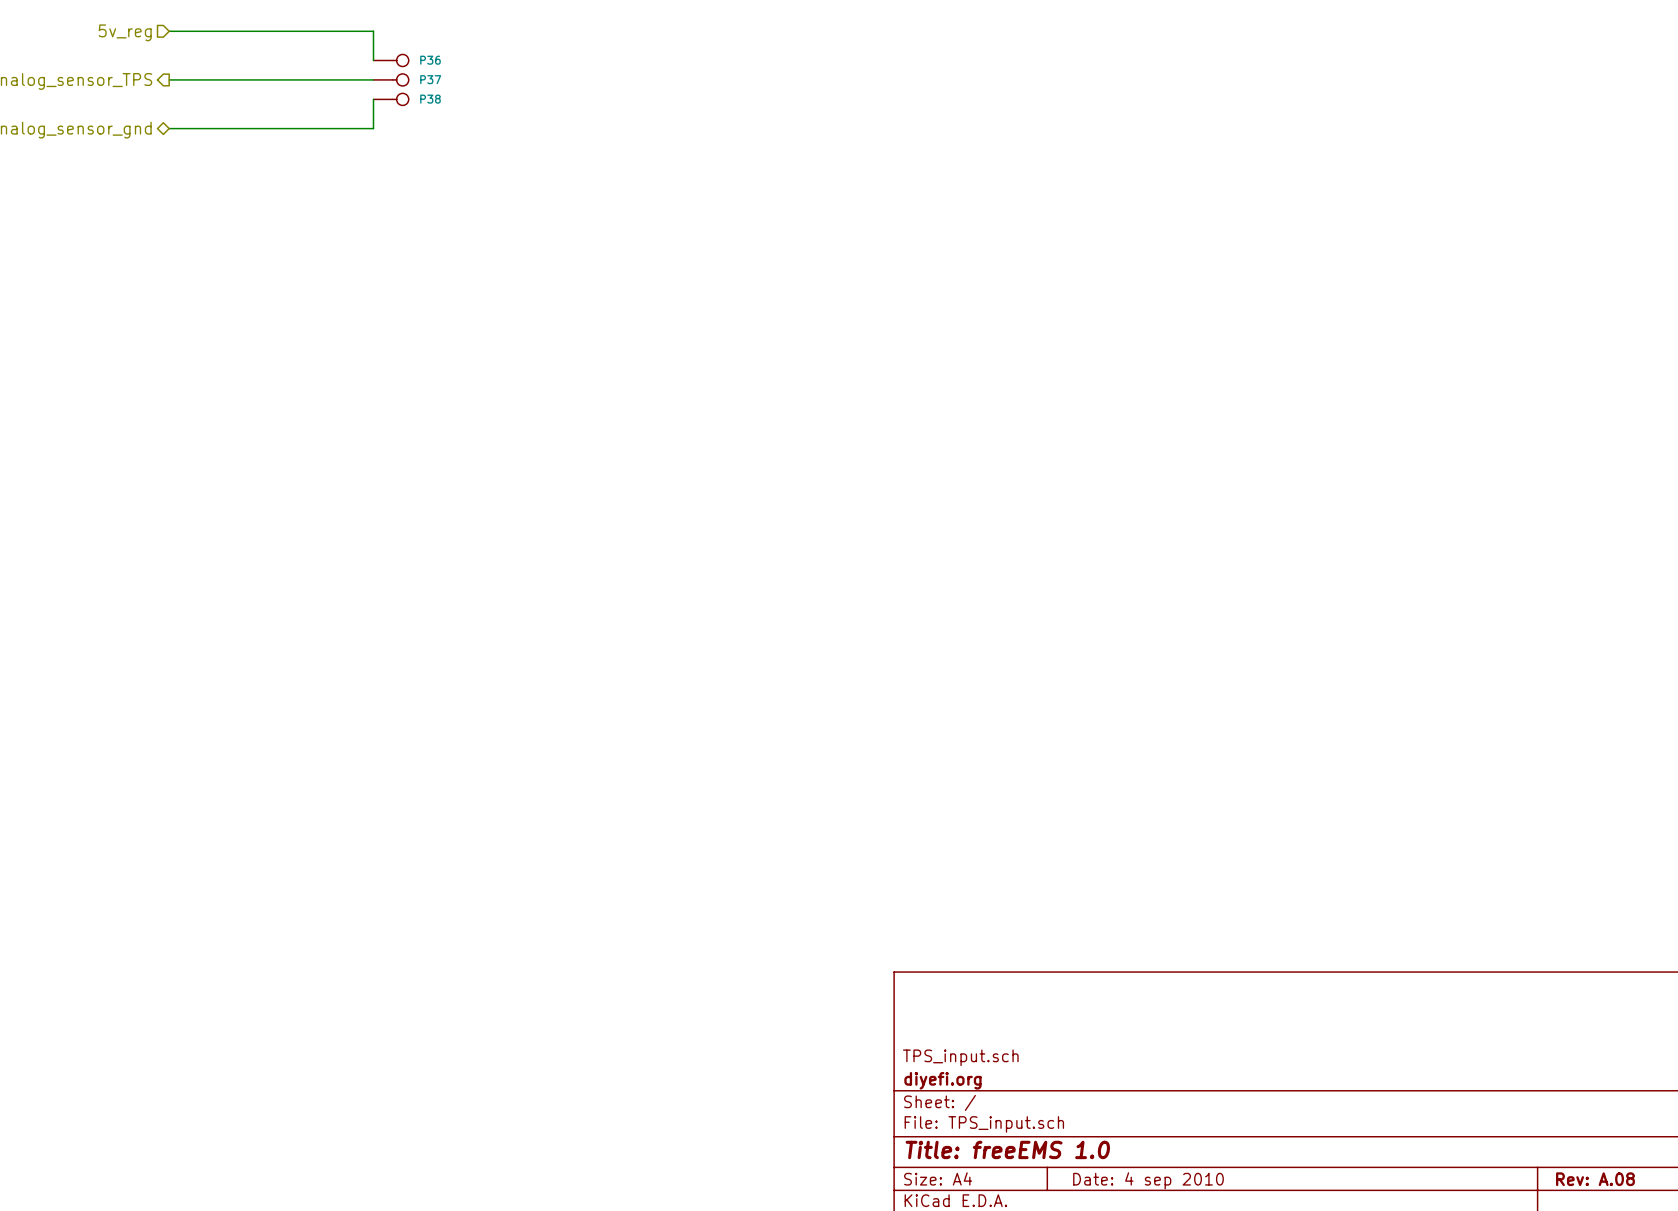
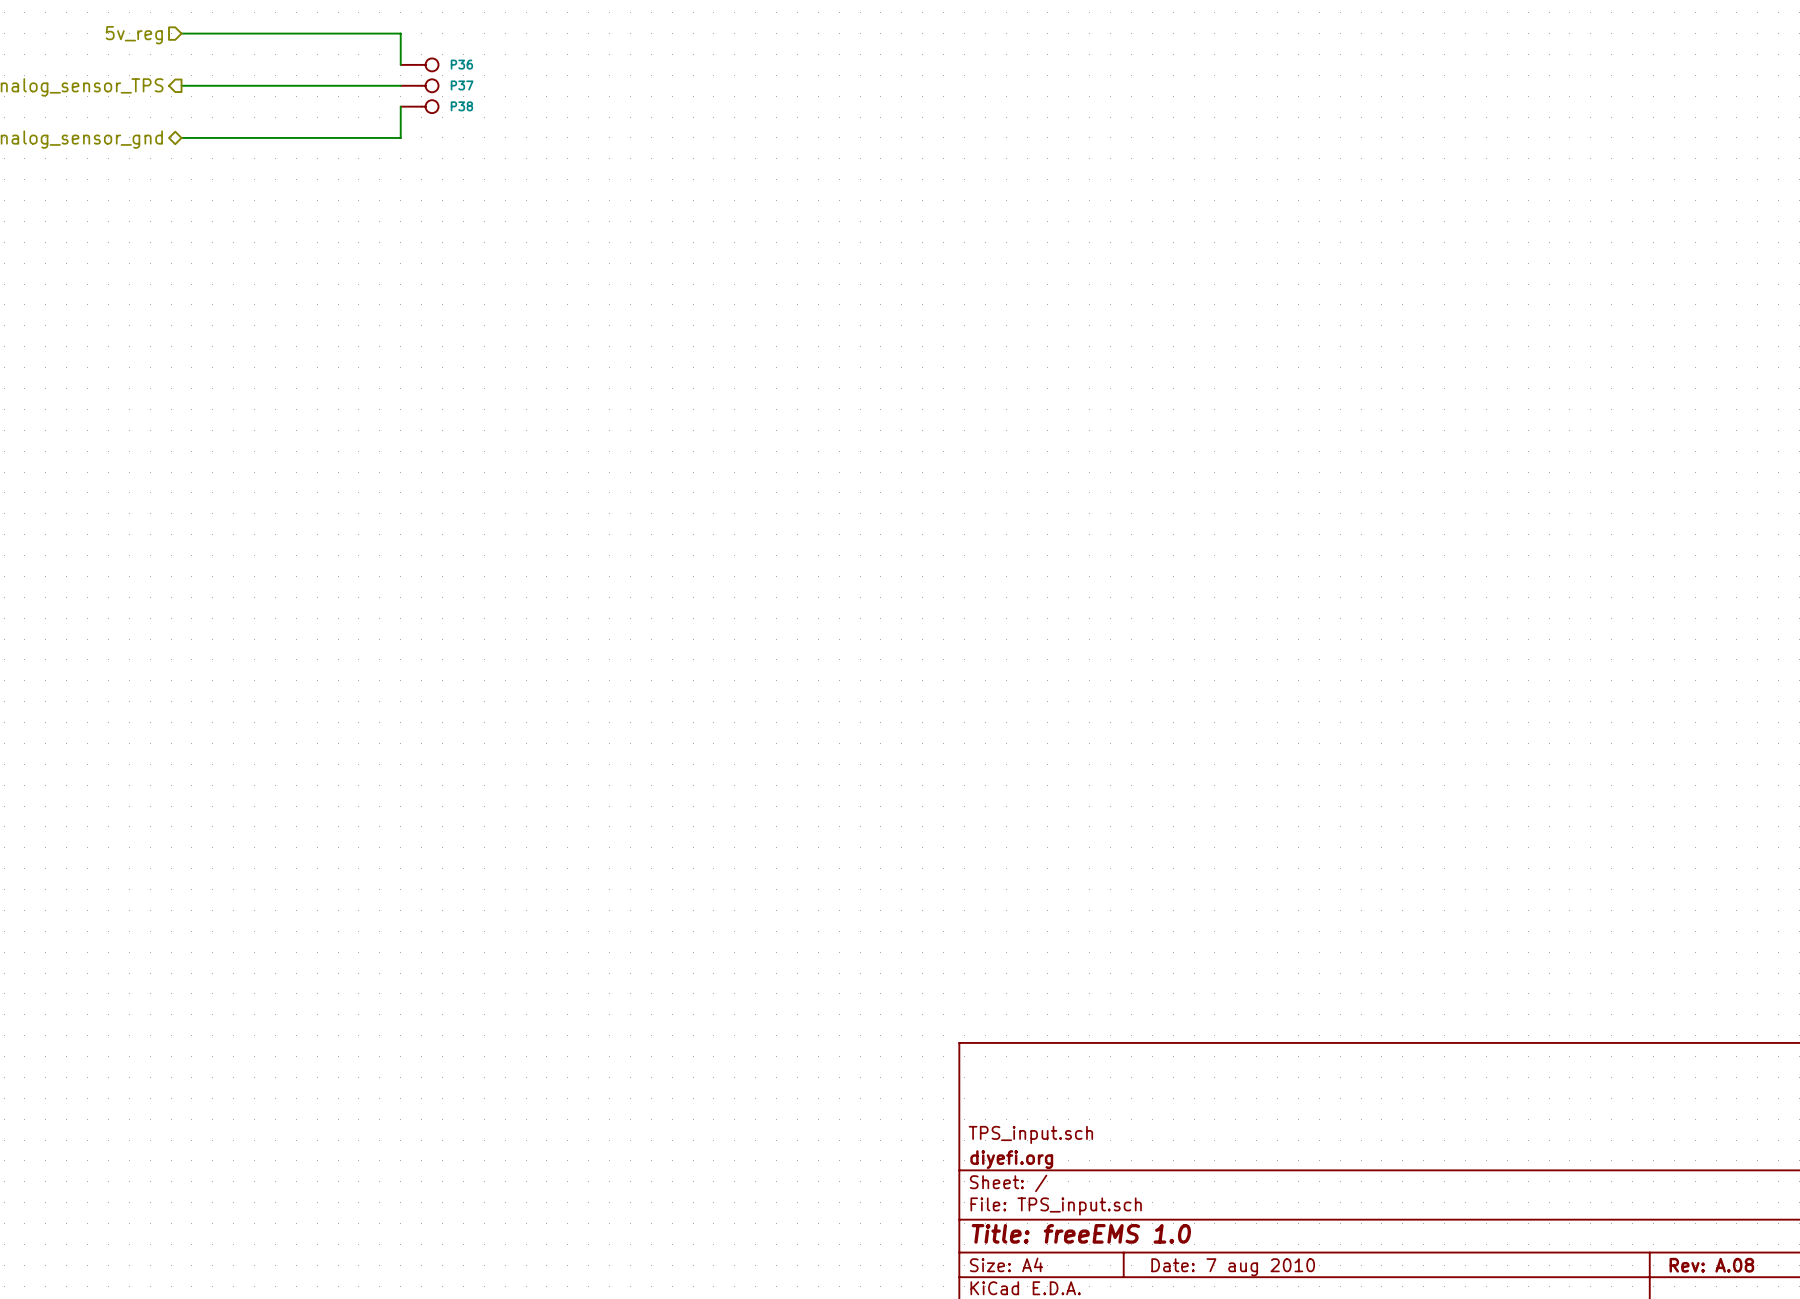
title block: Date: 4 sep 2010 (1148, 1180) -> Date: 7 aug 2010 (1233, 1267)

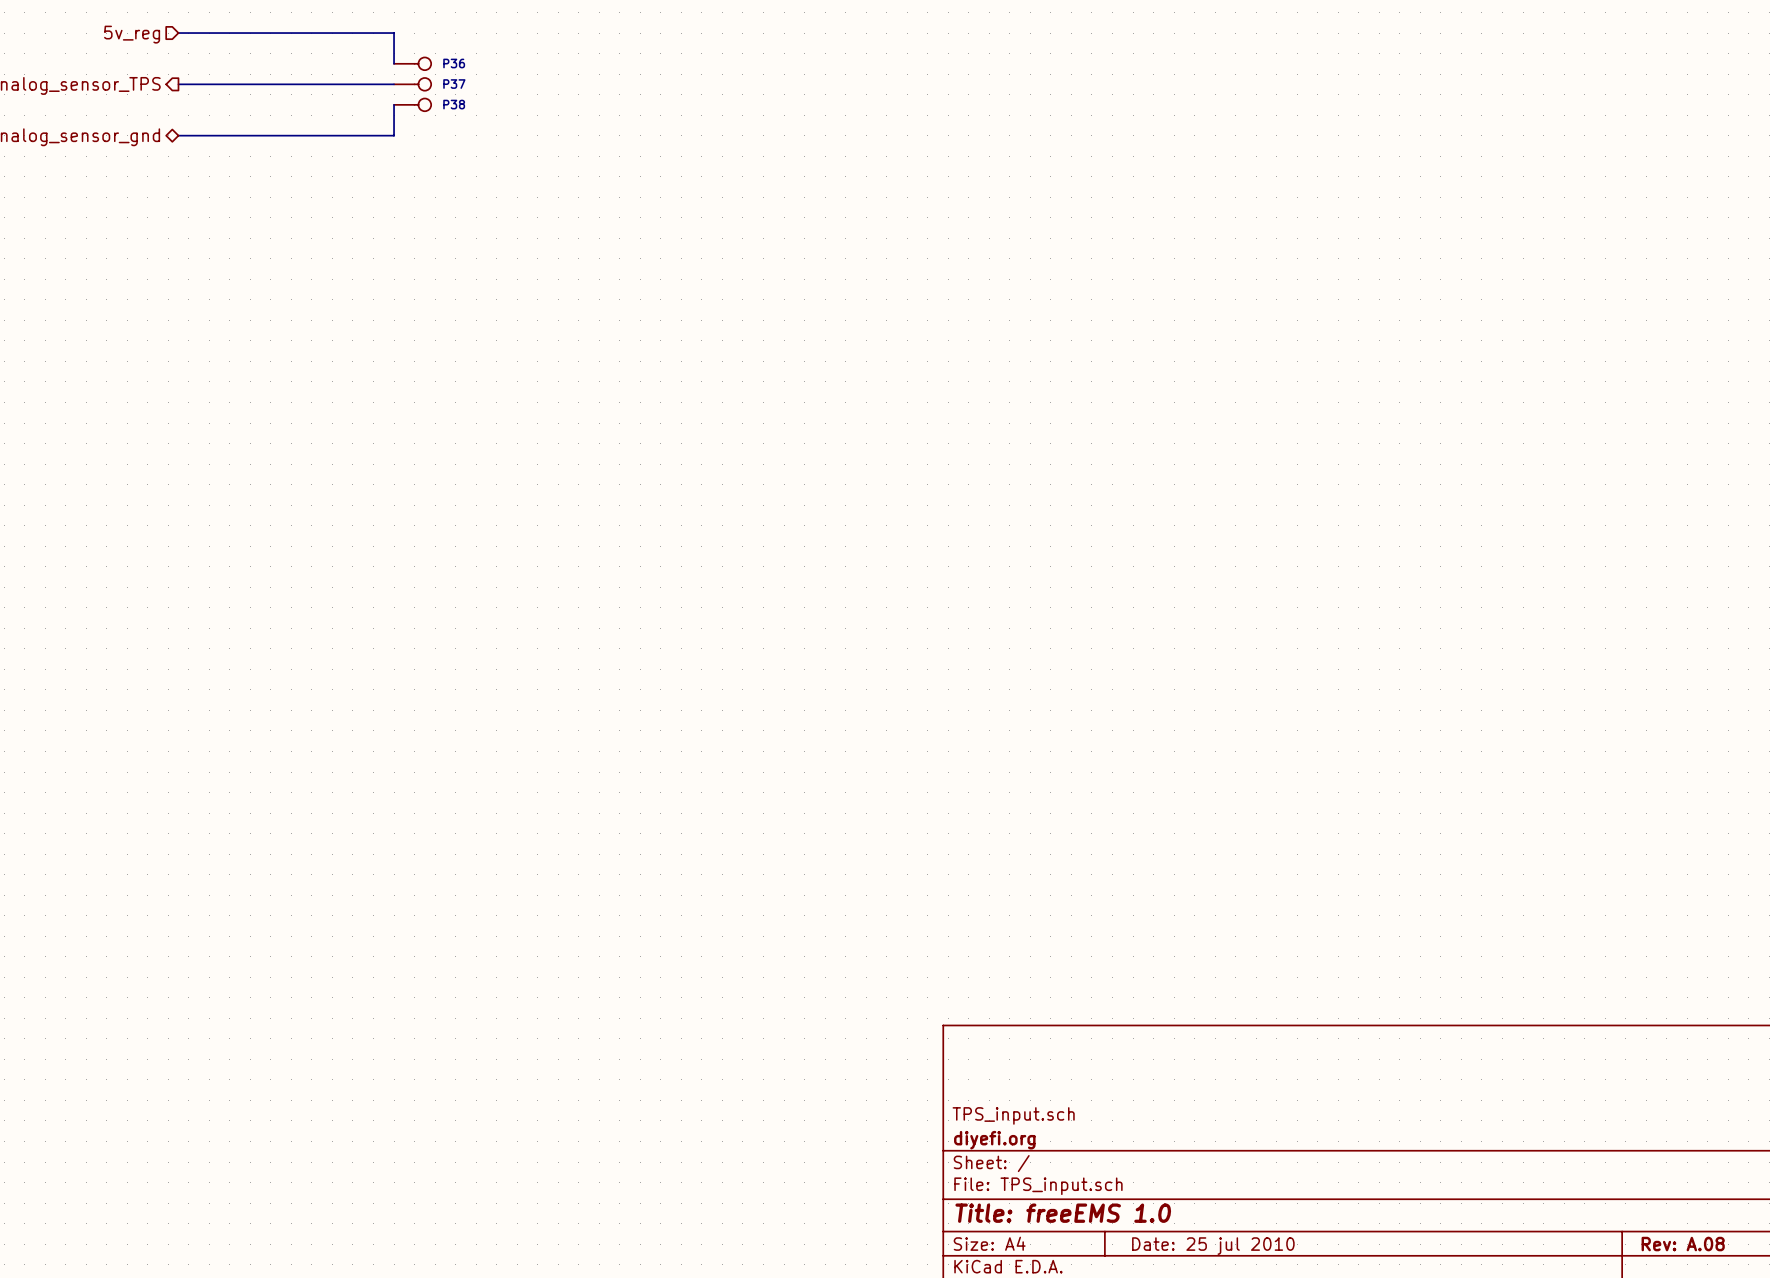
title block: Date: 7 aug 2010 (1233, 1267) -> Date: 25 jul 2010 (1213, 1246)

